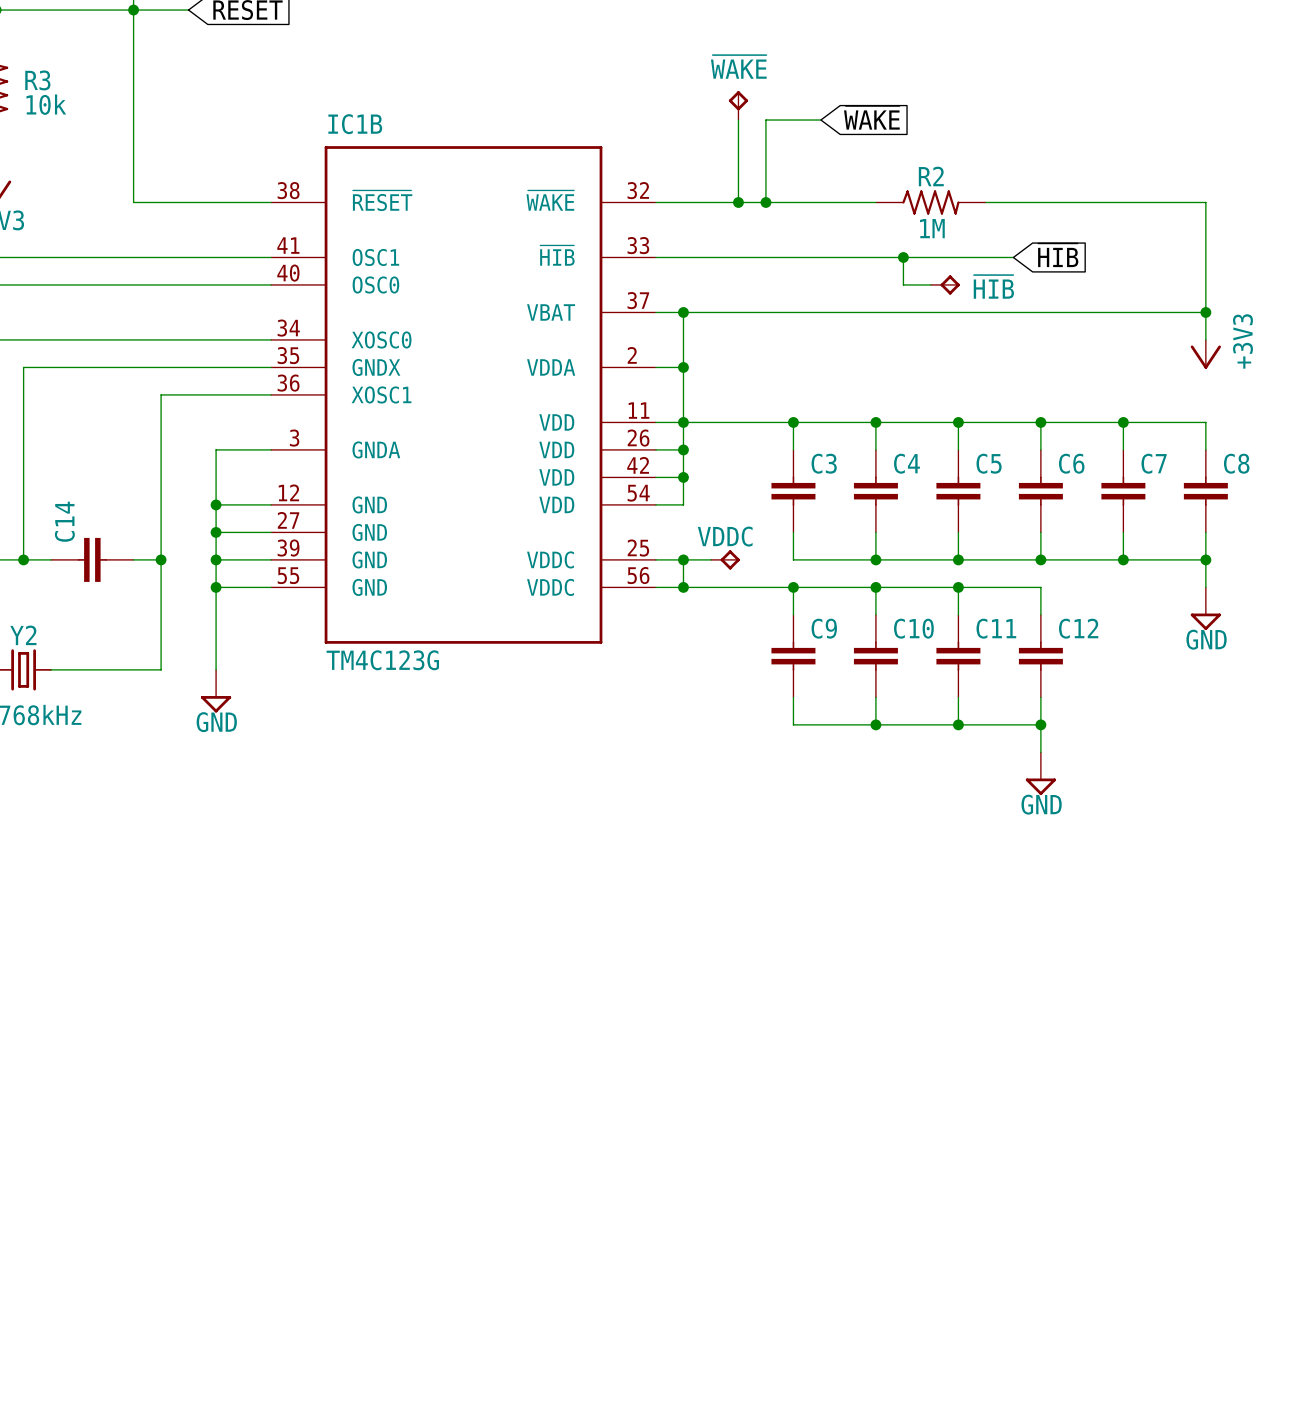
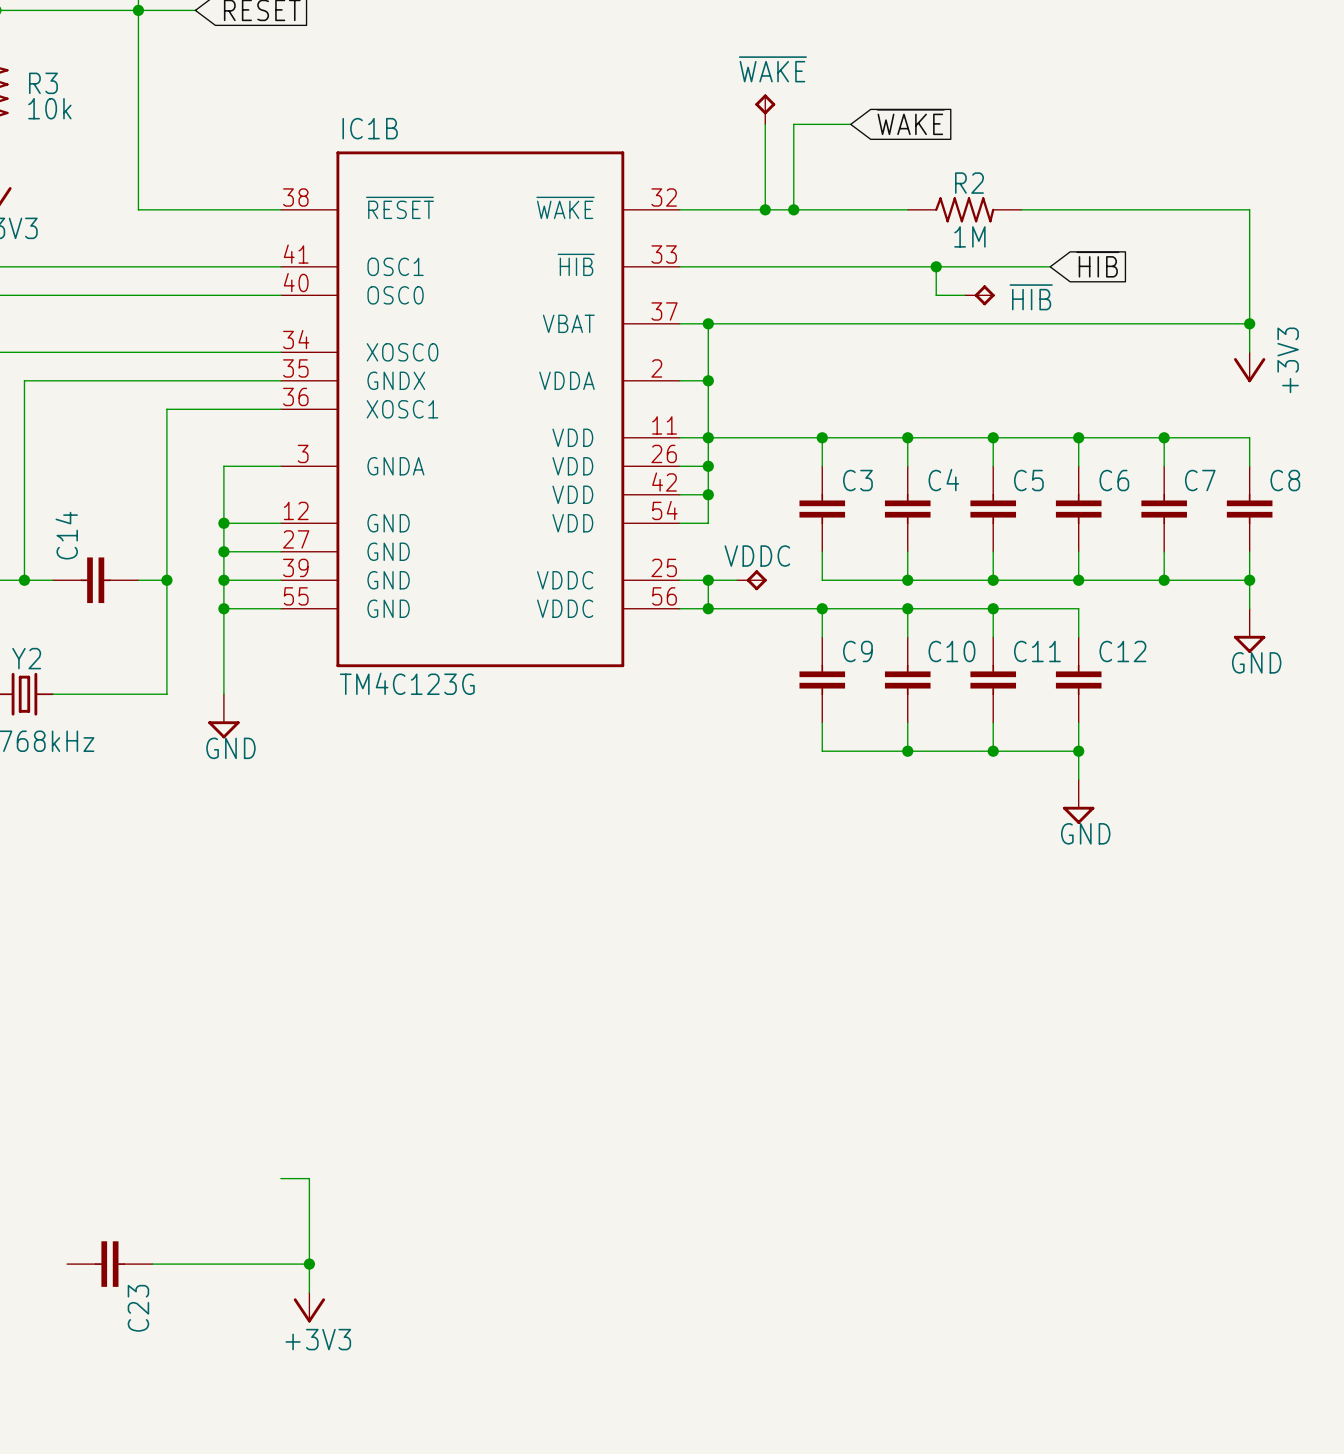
wire: none -> (280, 1178) (309, 1178) (309, 1292)
C23: none -> (109, 1264)
wire: none -> (152, 1264) (309, 1264)
junction: none -> (309, 1264)
power symbol: none -> +3V3 (309, 1307)

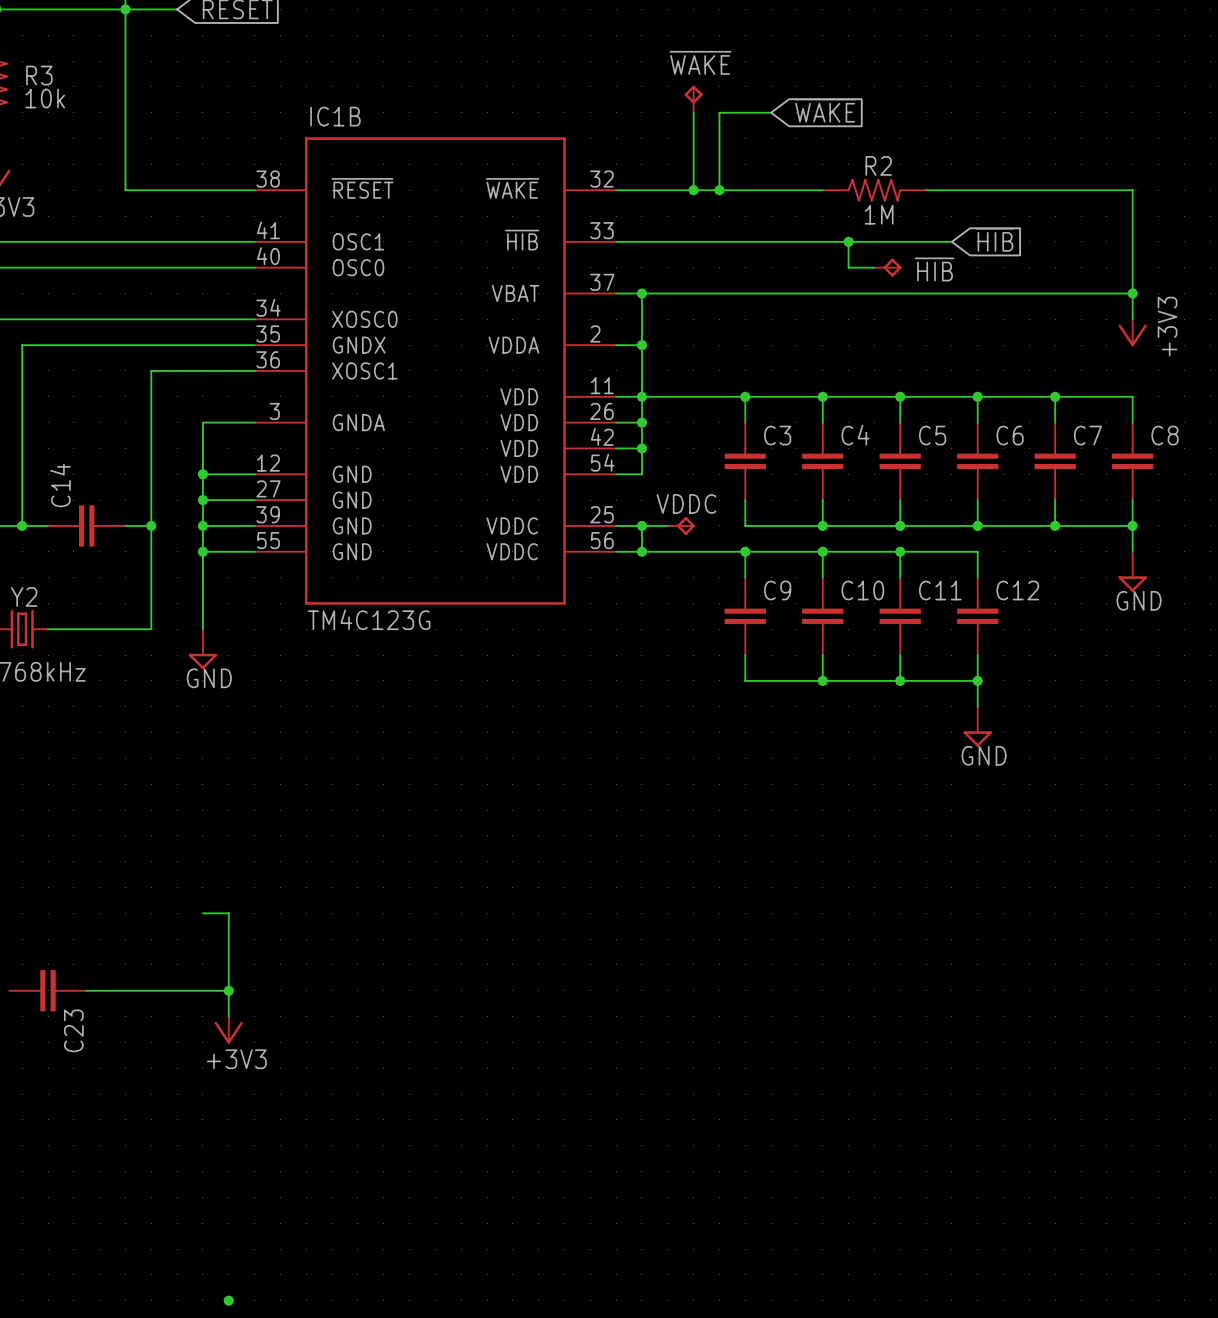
junction: none -> (228, 990)
power symbol: none -> +3V3 (228, 1030)
wire: (280, 1178) (309, 1178) (309, 1292) -> (202, 913) (228, 913) (228, 1016)
C23 position: (109, 1264) -> (48, 990)
wire: (152, 1264) (309, 1264) -> (86, 990) (228, 990)
junction: (309, 1264) -> none
power symbol: +3V3 (309, 1307) -> none
junction: none -> (228, 1300)

